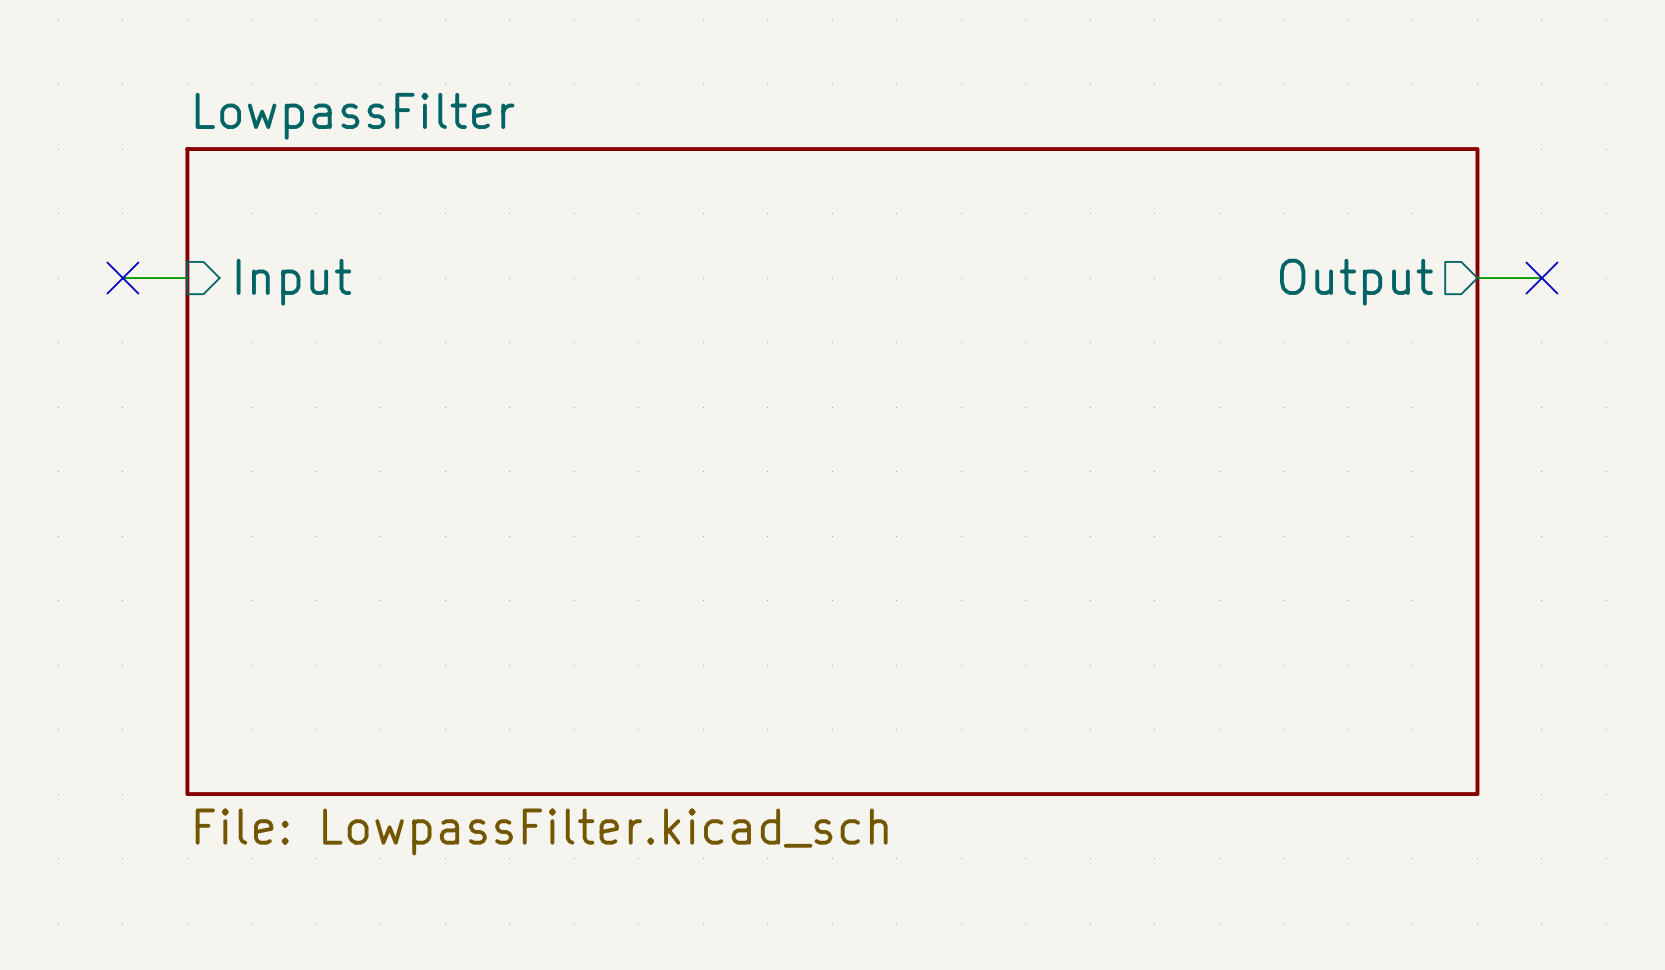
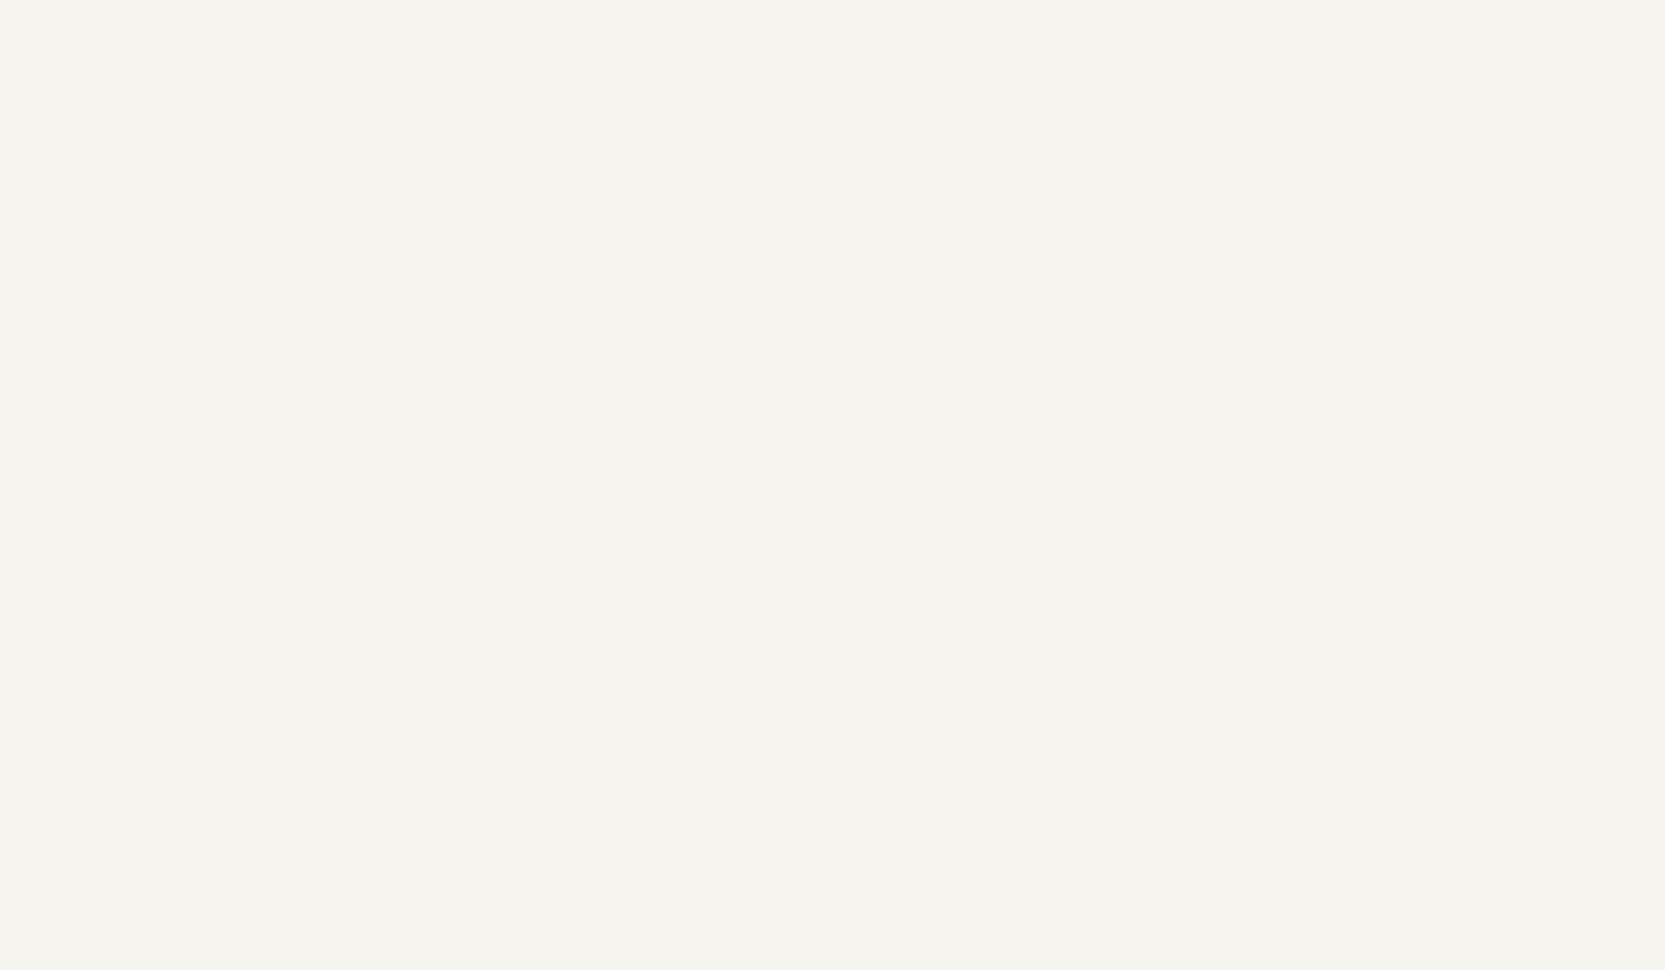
wire: (122, 278) (187, 278) -> none
no-connect mark: (122, 278) -> none
wire: (1477, 278) (1541, 278) -> none
no-connect mark: (1541, 278) -> none
sheet pin: Input (293, 282) -> none
sheet pin: Output (1356, 282) -> none
sheet LowpassFilter: File: LowpassFilter.kicad_sch (832, 471) -> none

